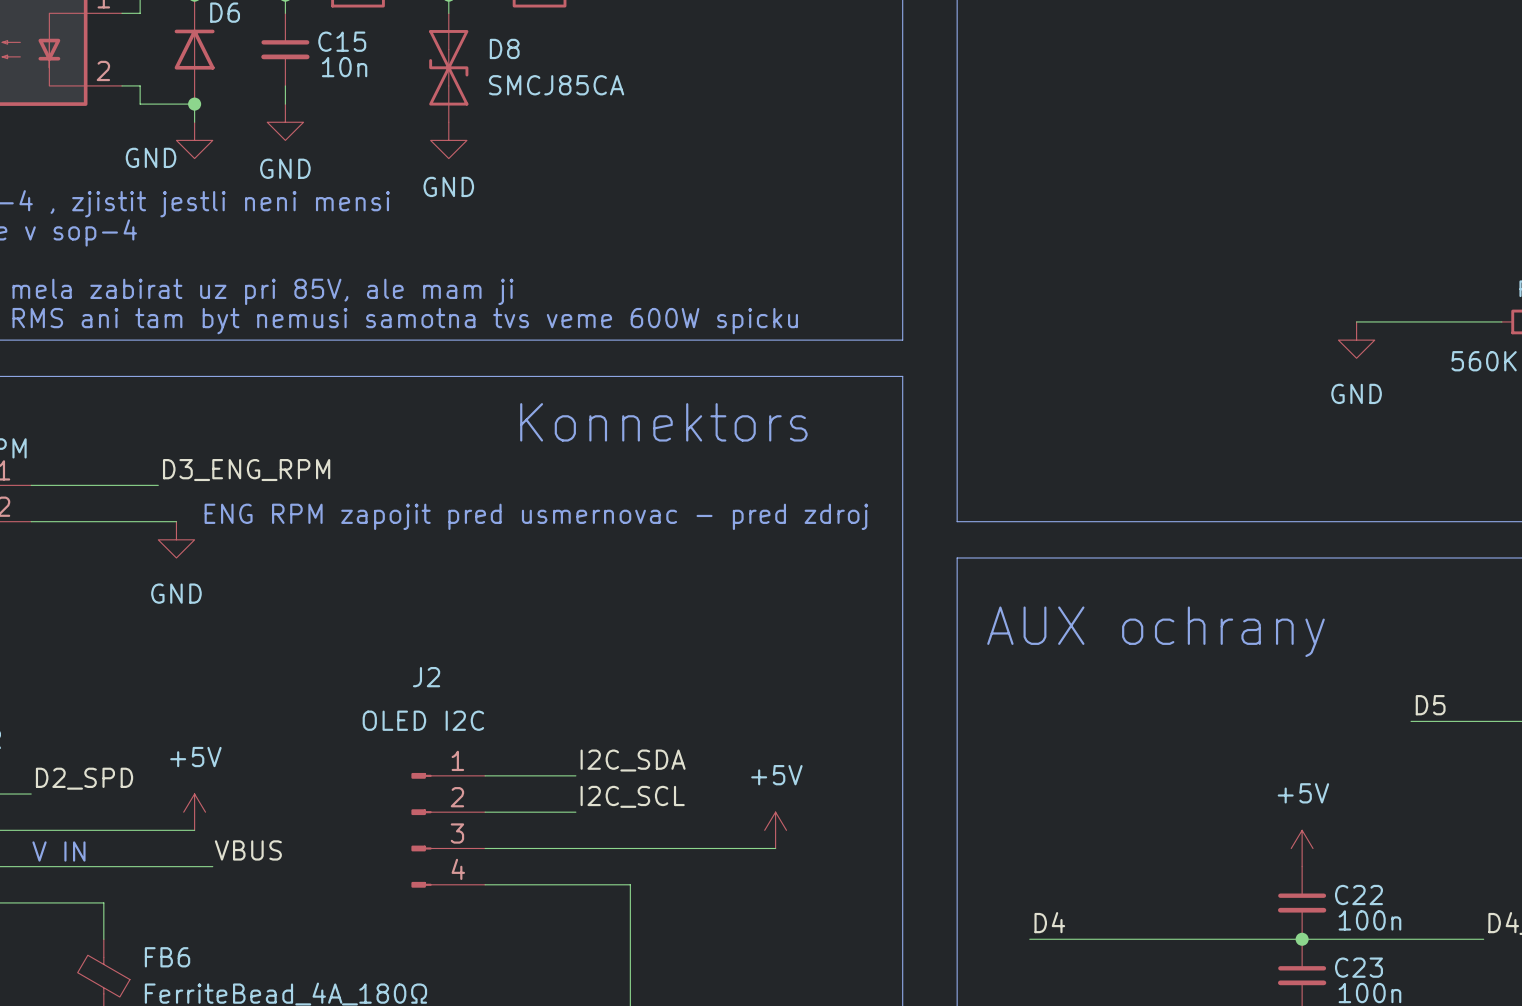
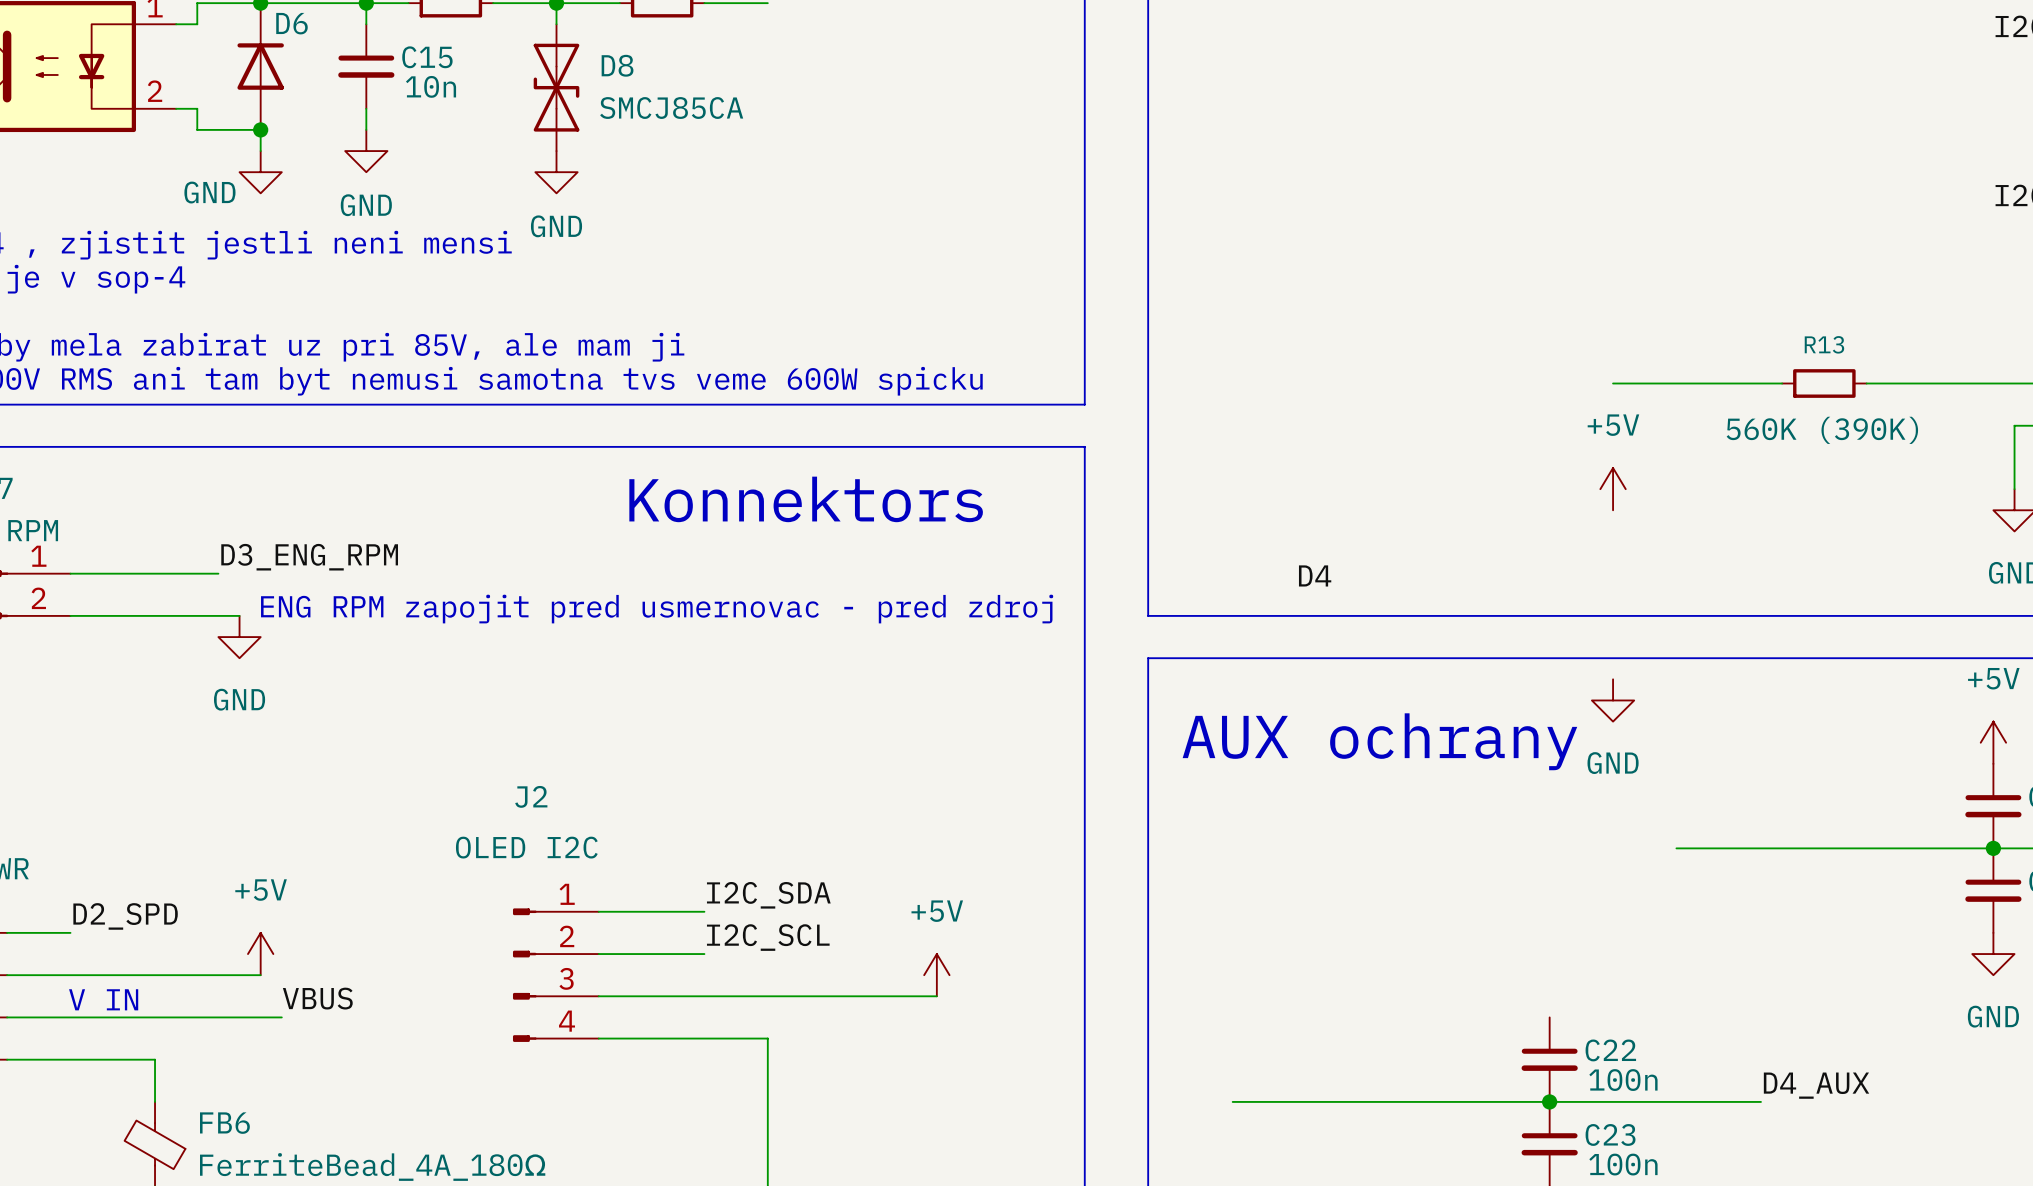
power symbol position: GND (1356, 340) -> GND (1613, 700)
power symbol: none -> +5V (1613, 489)
label: none -> D4 (1315, 575)
label: D5 (1430, 705) -> none
power symbol: +5V (1302, 848) -> none
label: D4 (1049, 922) -> none

